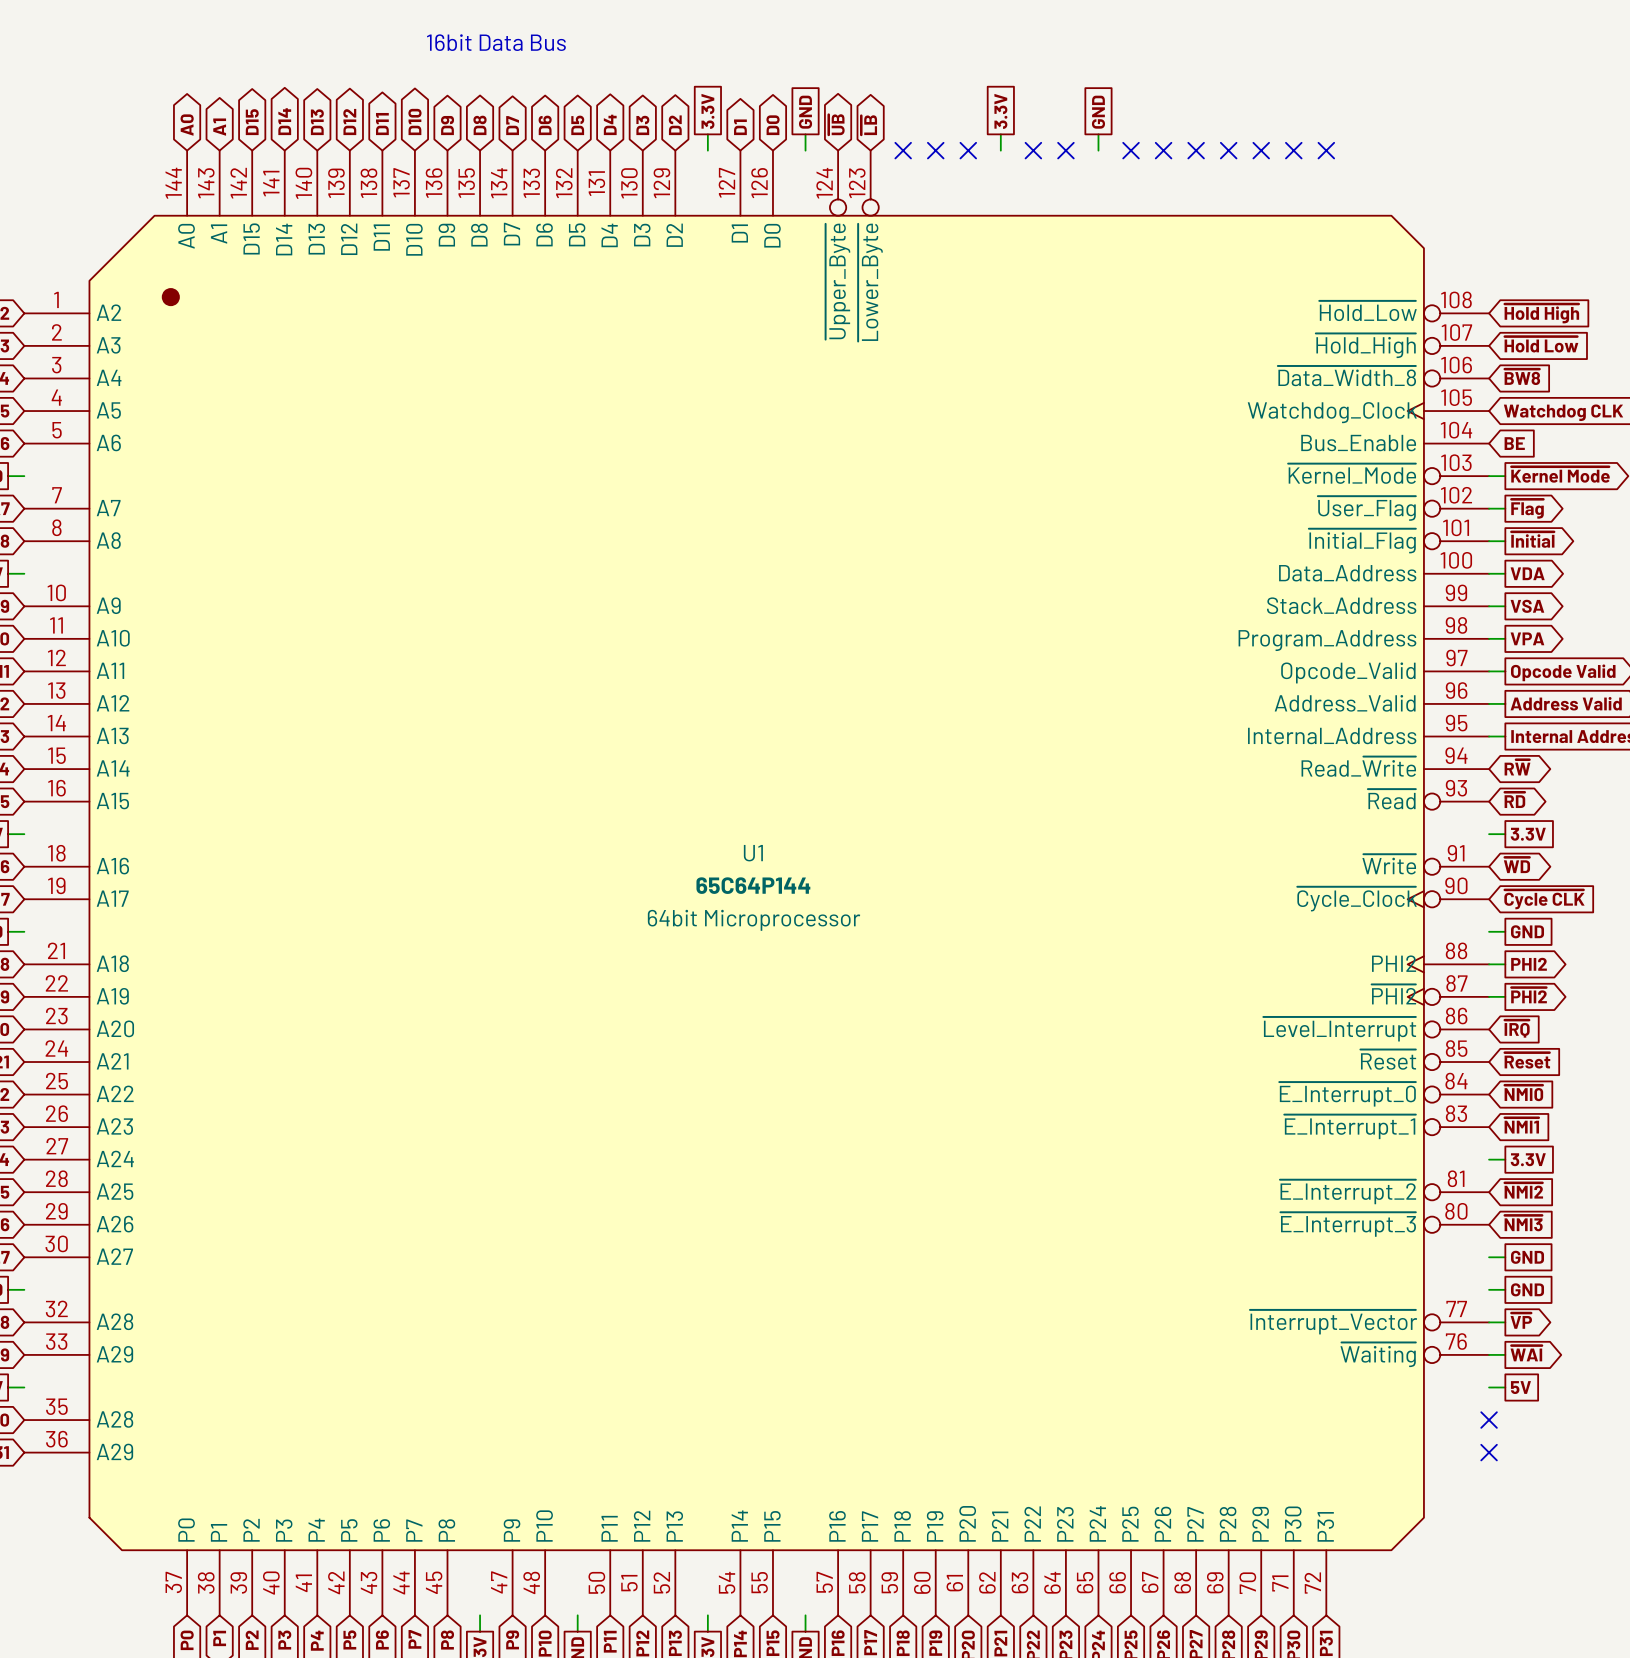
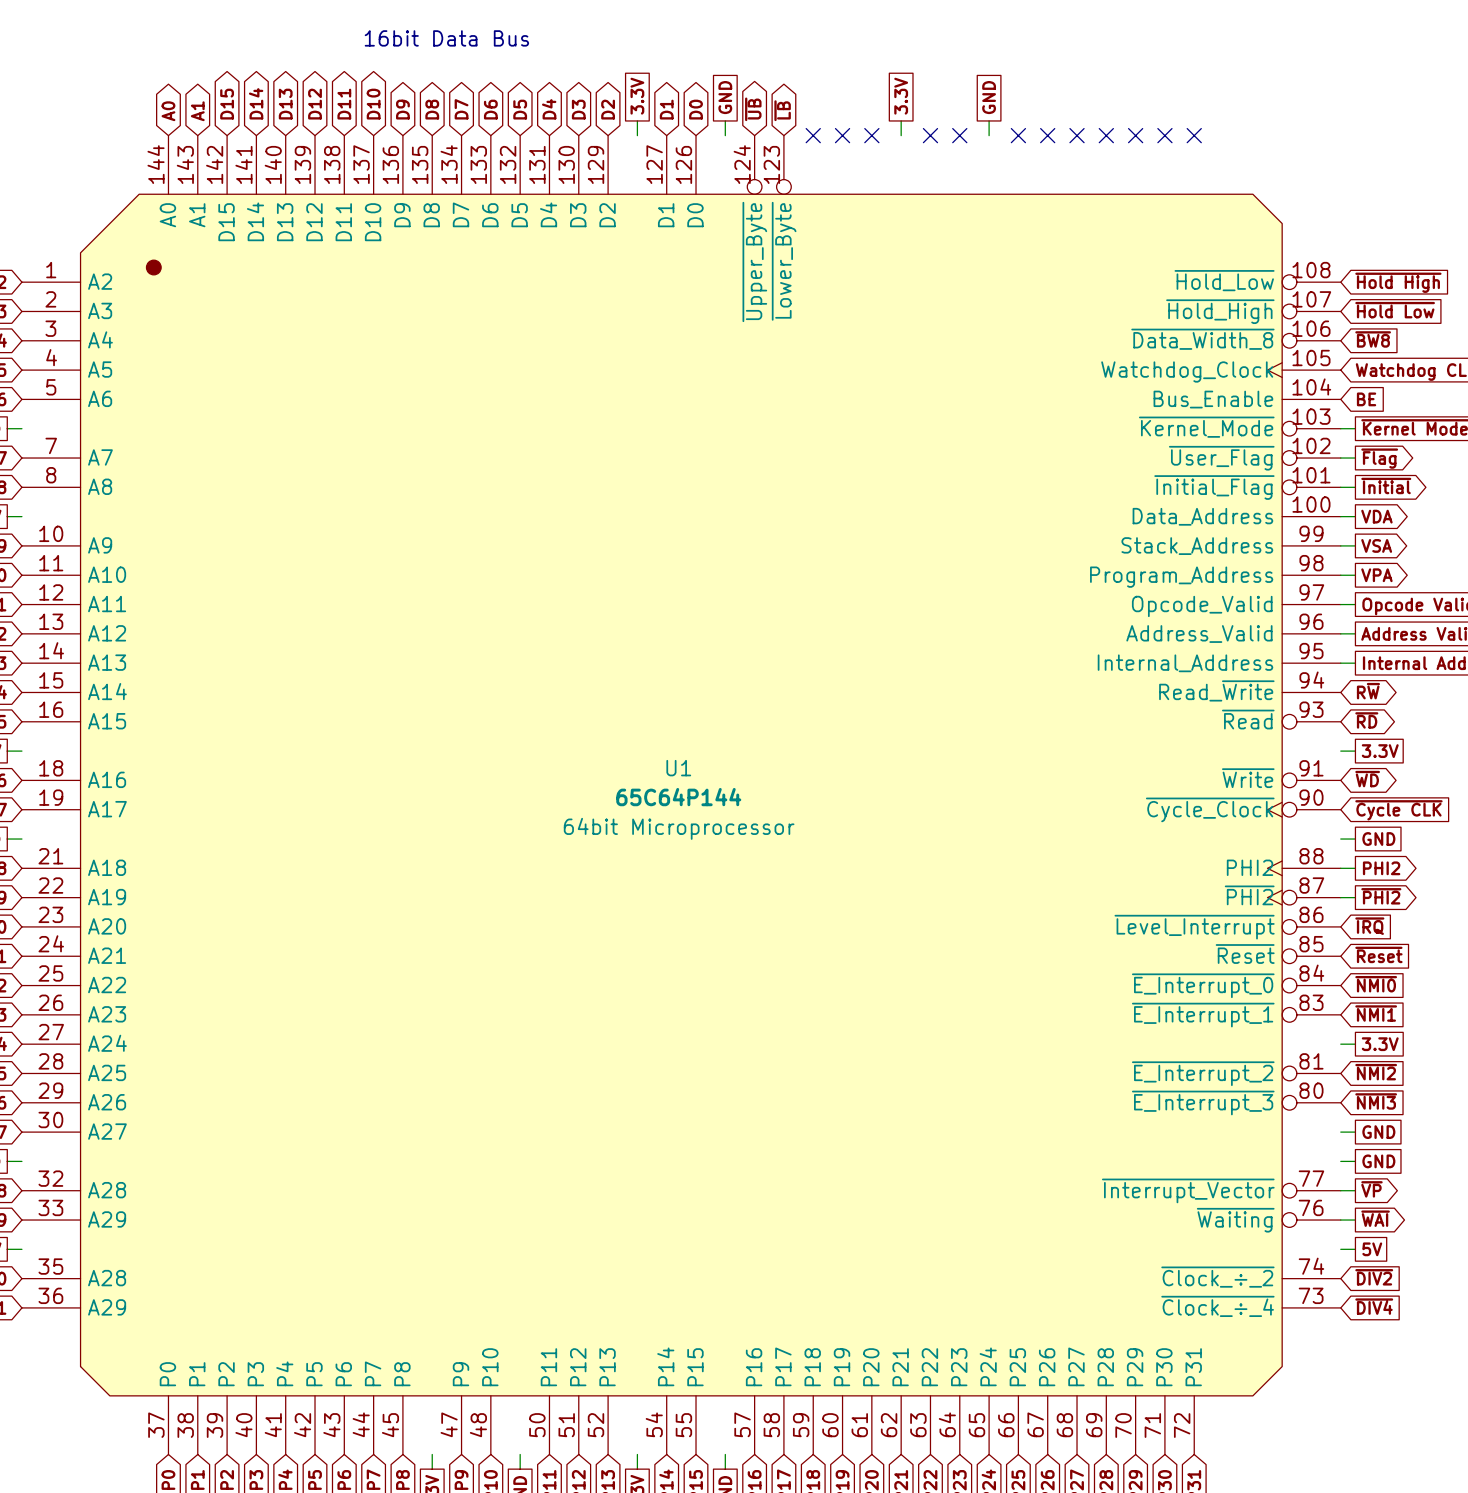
U1 symbol: [24, 150, 1490, 1616] -> [21, 135, 1341, 1455]
global label: none -> ~{DIV2} (1374, 1277)
no-connect mark: (1489, 1420) -> none
global label: none -> ~{DIV4} (1374, 1306)
no-connect mark: (1489, 1452) -> none

